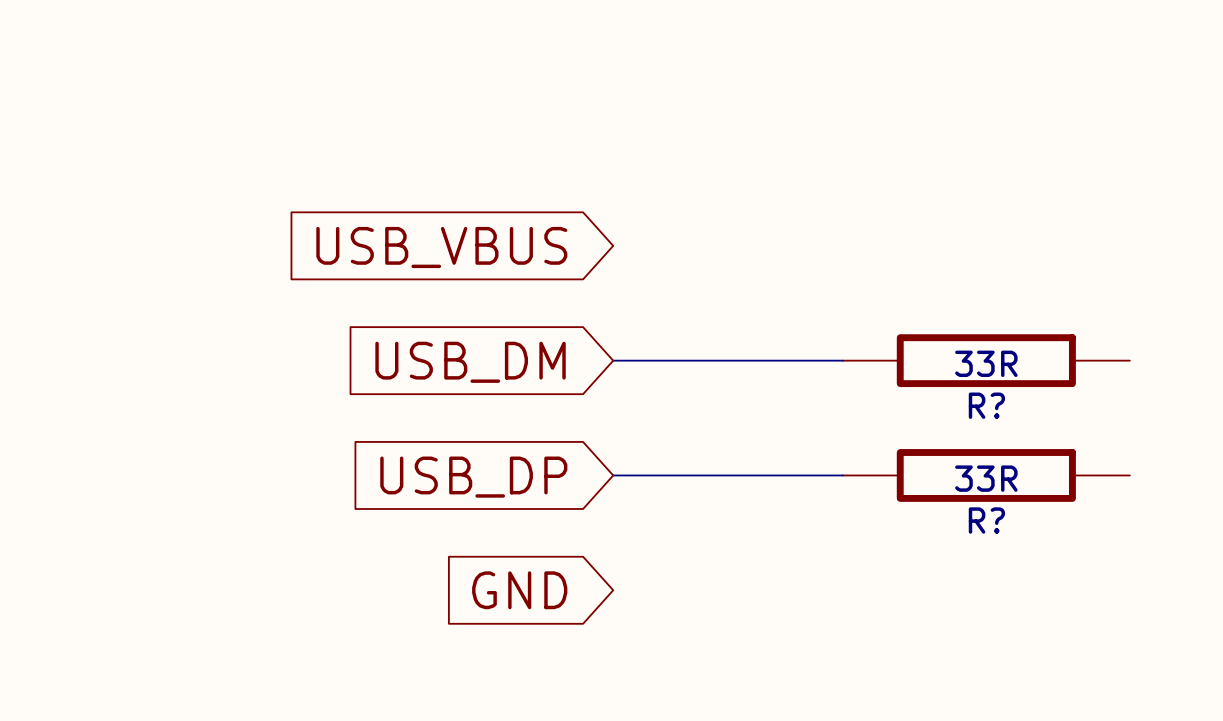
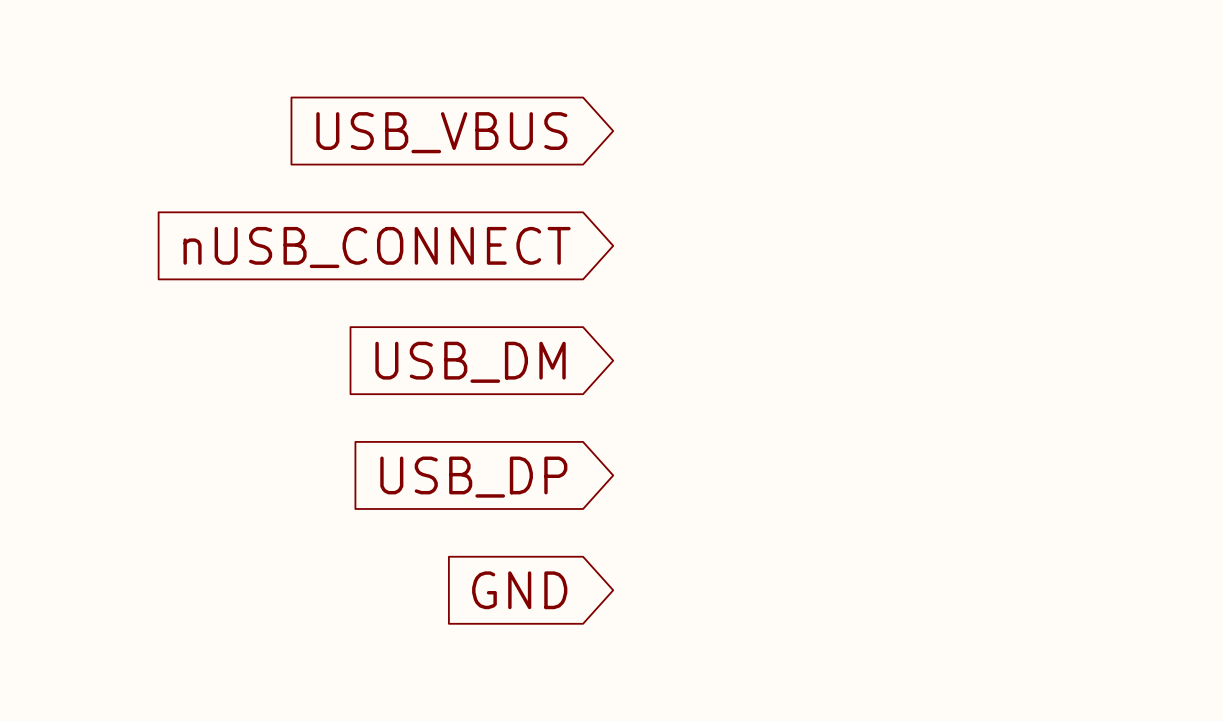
global label: none -> USB_VBUS (441, 132)
global label: USB_VBUS (441, 247) -> nUSB_CONNECT (377, 247)
wire: (613, 360) (842, 360) -> none
R?: 33R (986, 360) -> none
wire: (613, 475) (842, 475) -> none
R?: 33R (986, 475) -> none

